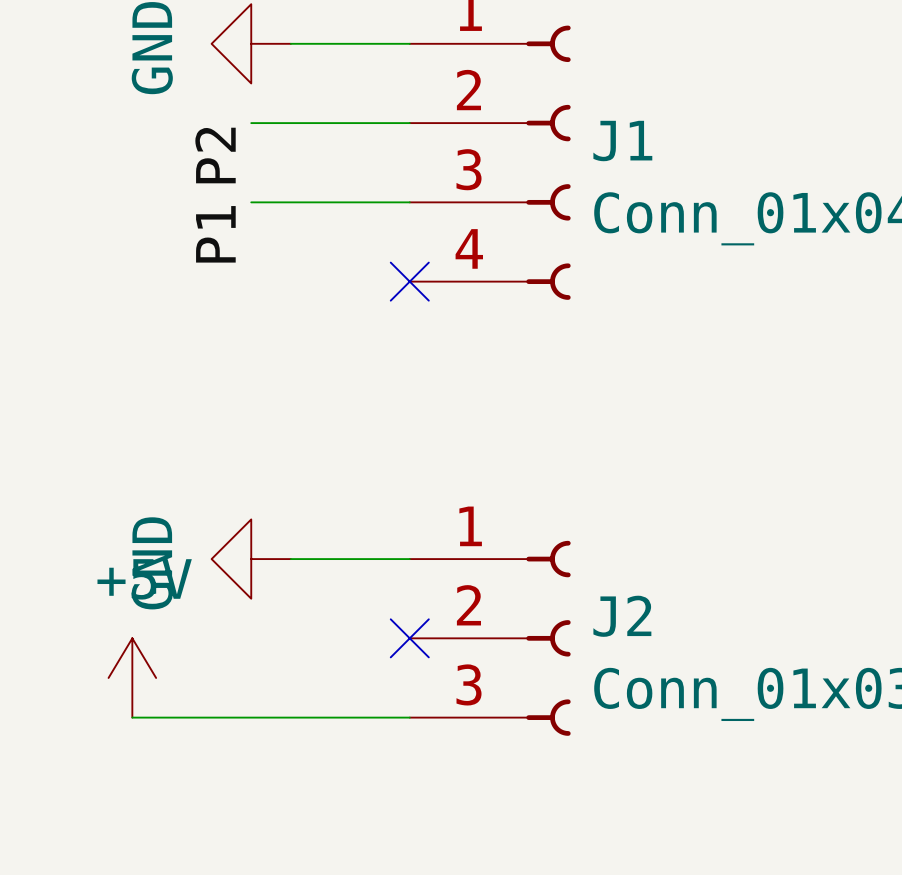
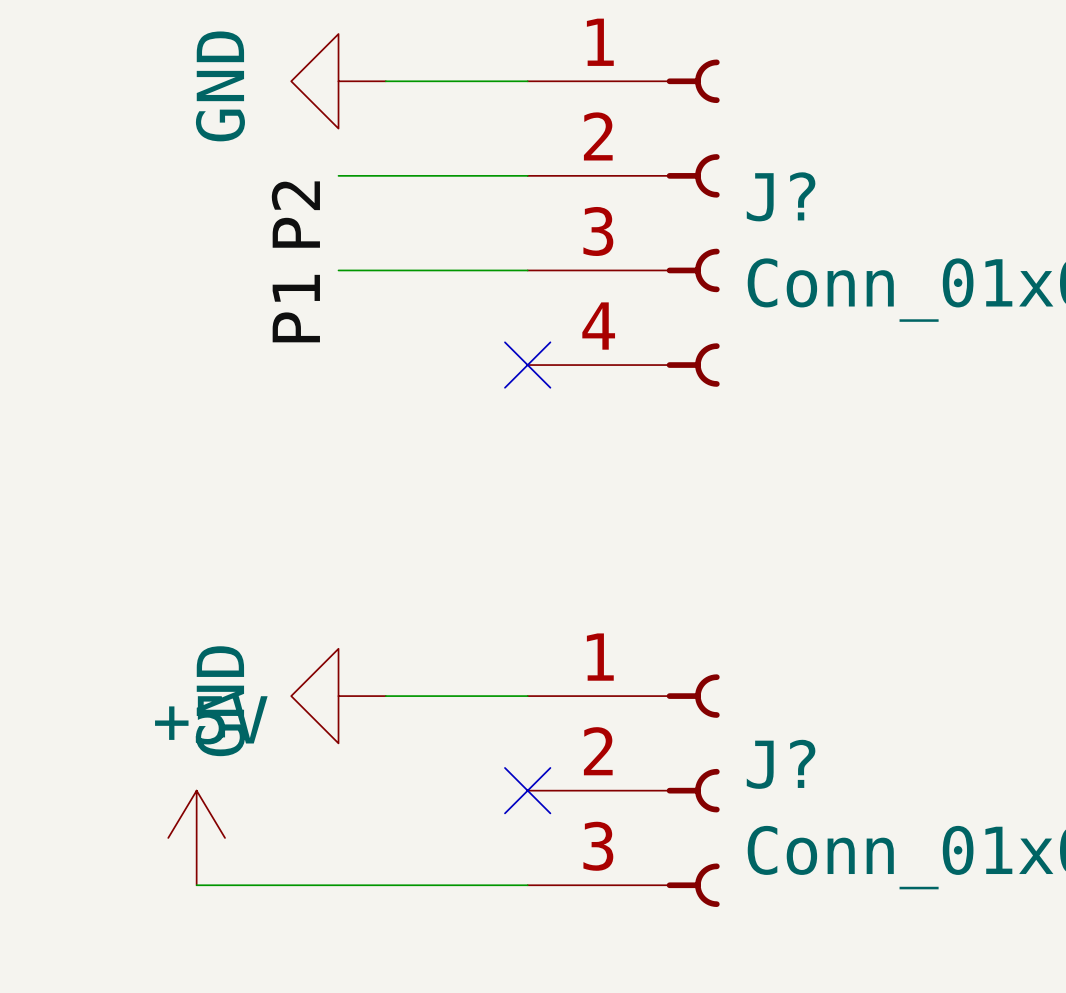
J1 name: J1 (622, 141) -> J? (781, 196)
J2 name: J2 (622, 616) -> J? (781, 764)

